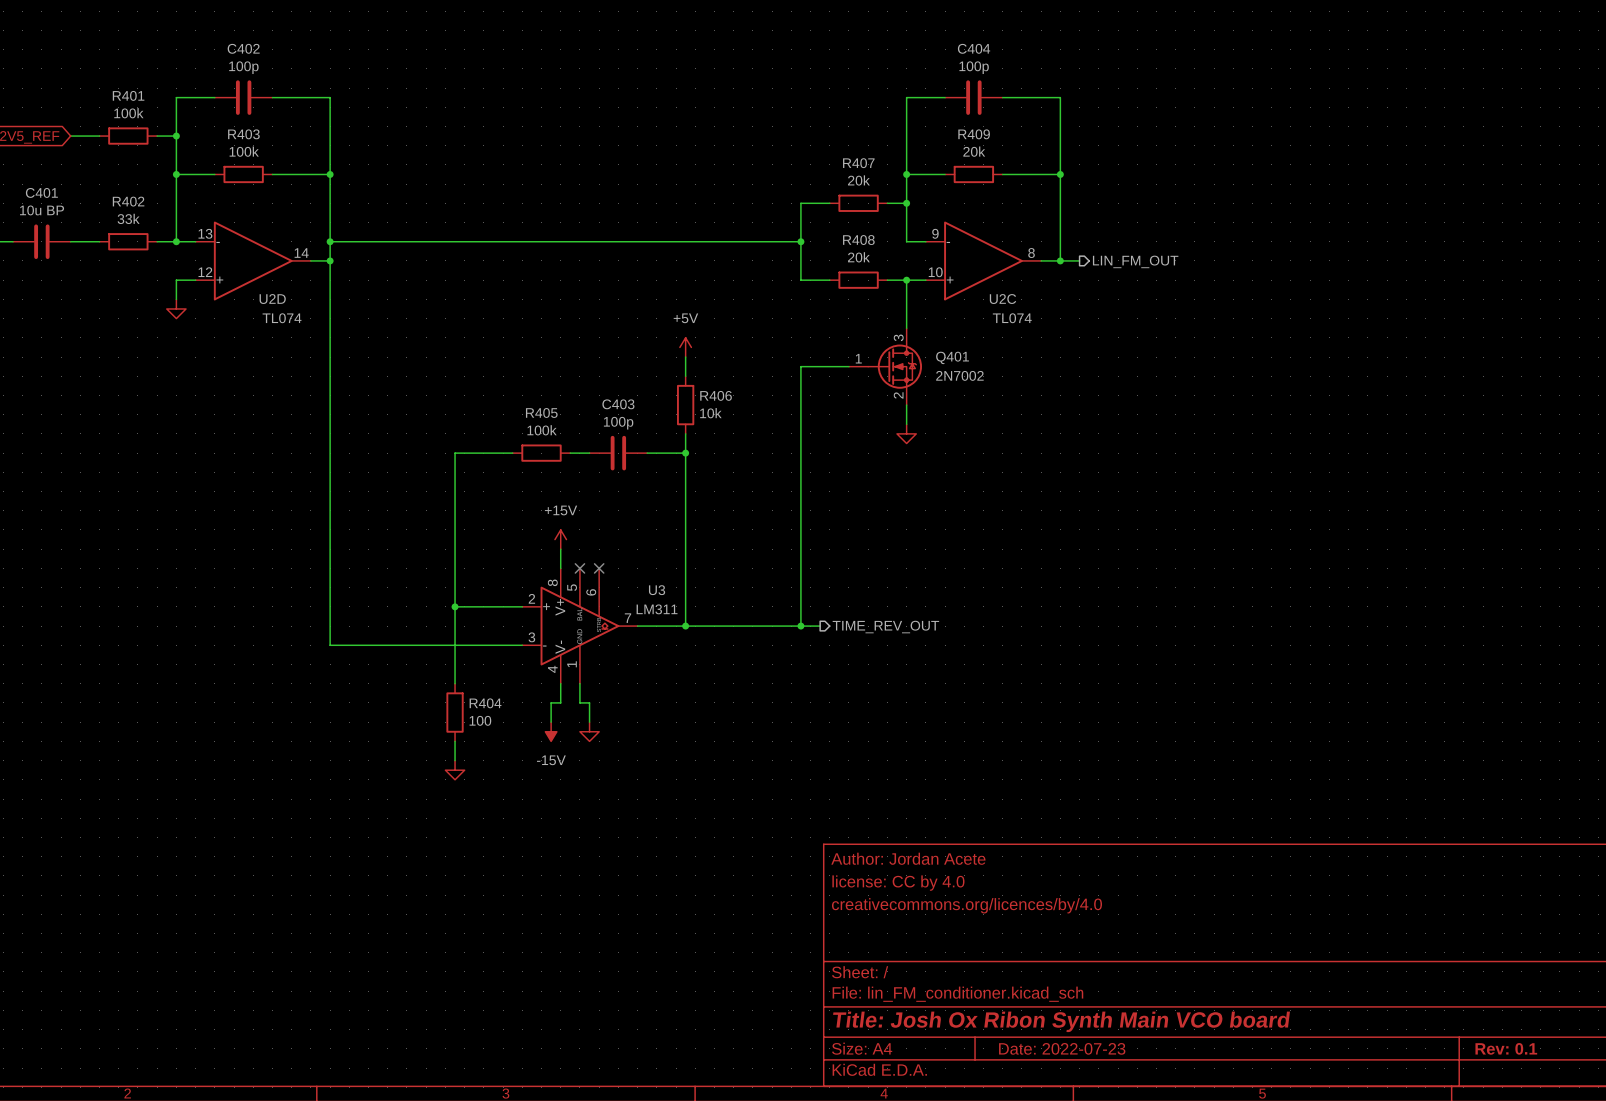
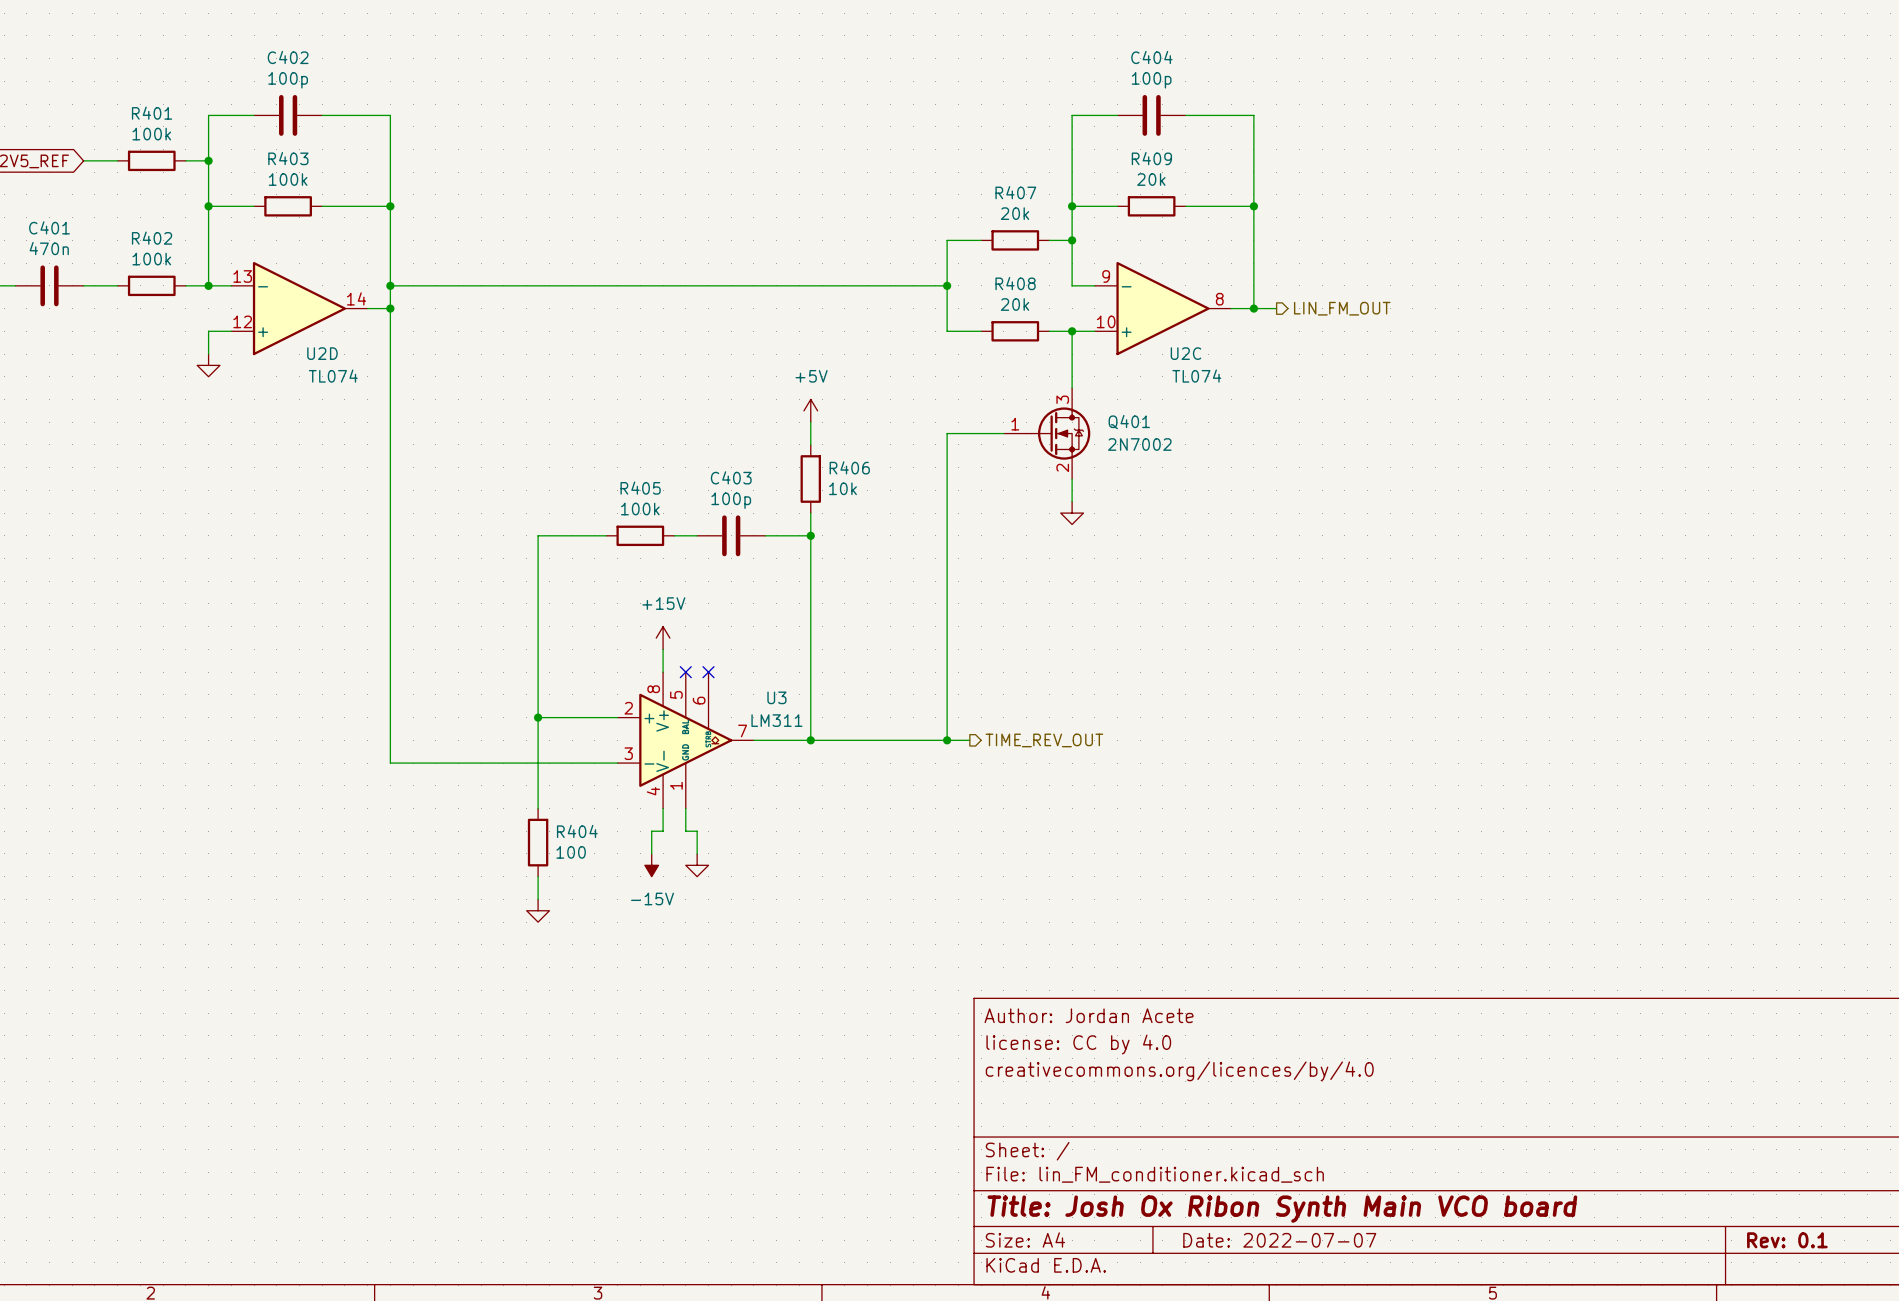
C401 value: 10u BP (42, 210) -> 470n (49, 248)
R402 value: 33k (128, 218) -> 100k (151, 259)
title block: Date: 2022-07-23 (1062, 1048) -> Date: 2022-07-07 (1279, 1240)

